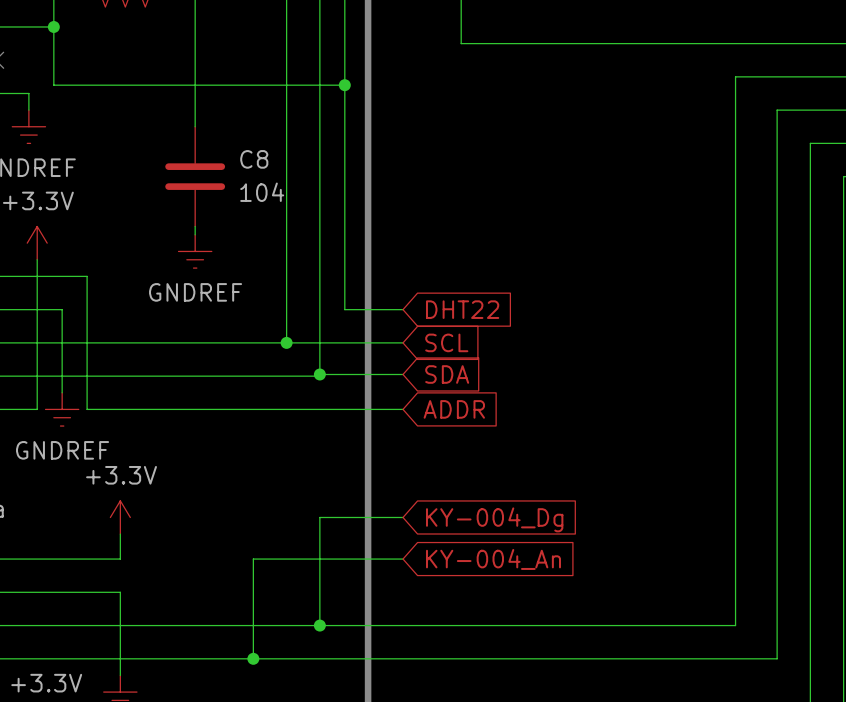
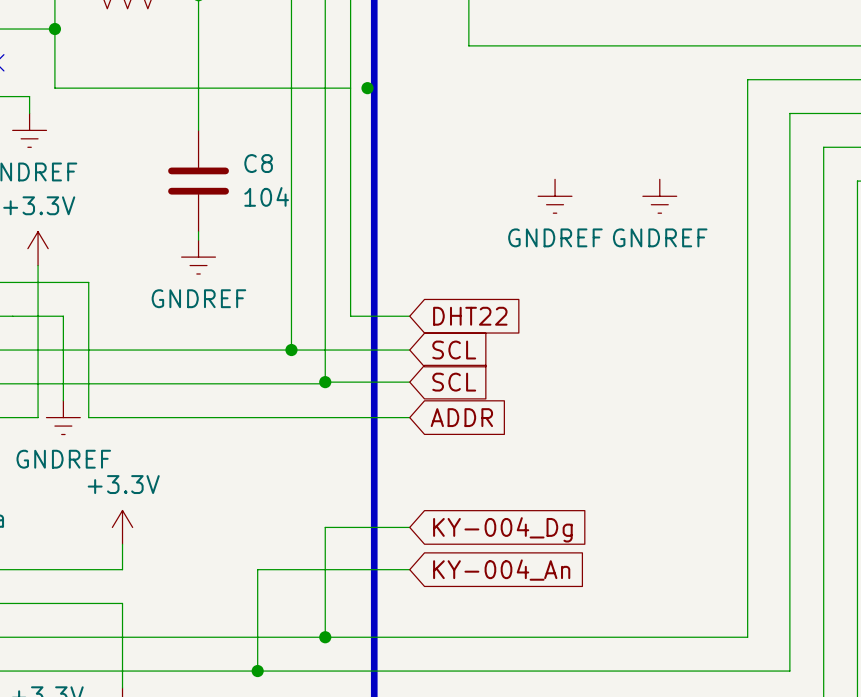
junction position: (344, 85) -> (367, 88)
power symbol: none -> GNDREF (555, 196)
power symbol: none -> GNDREF (659, 196)
global label: SDA (447, 374) -> SCL (454, 382)

